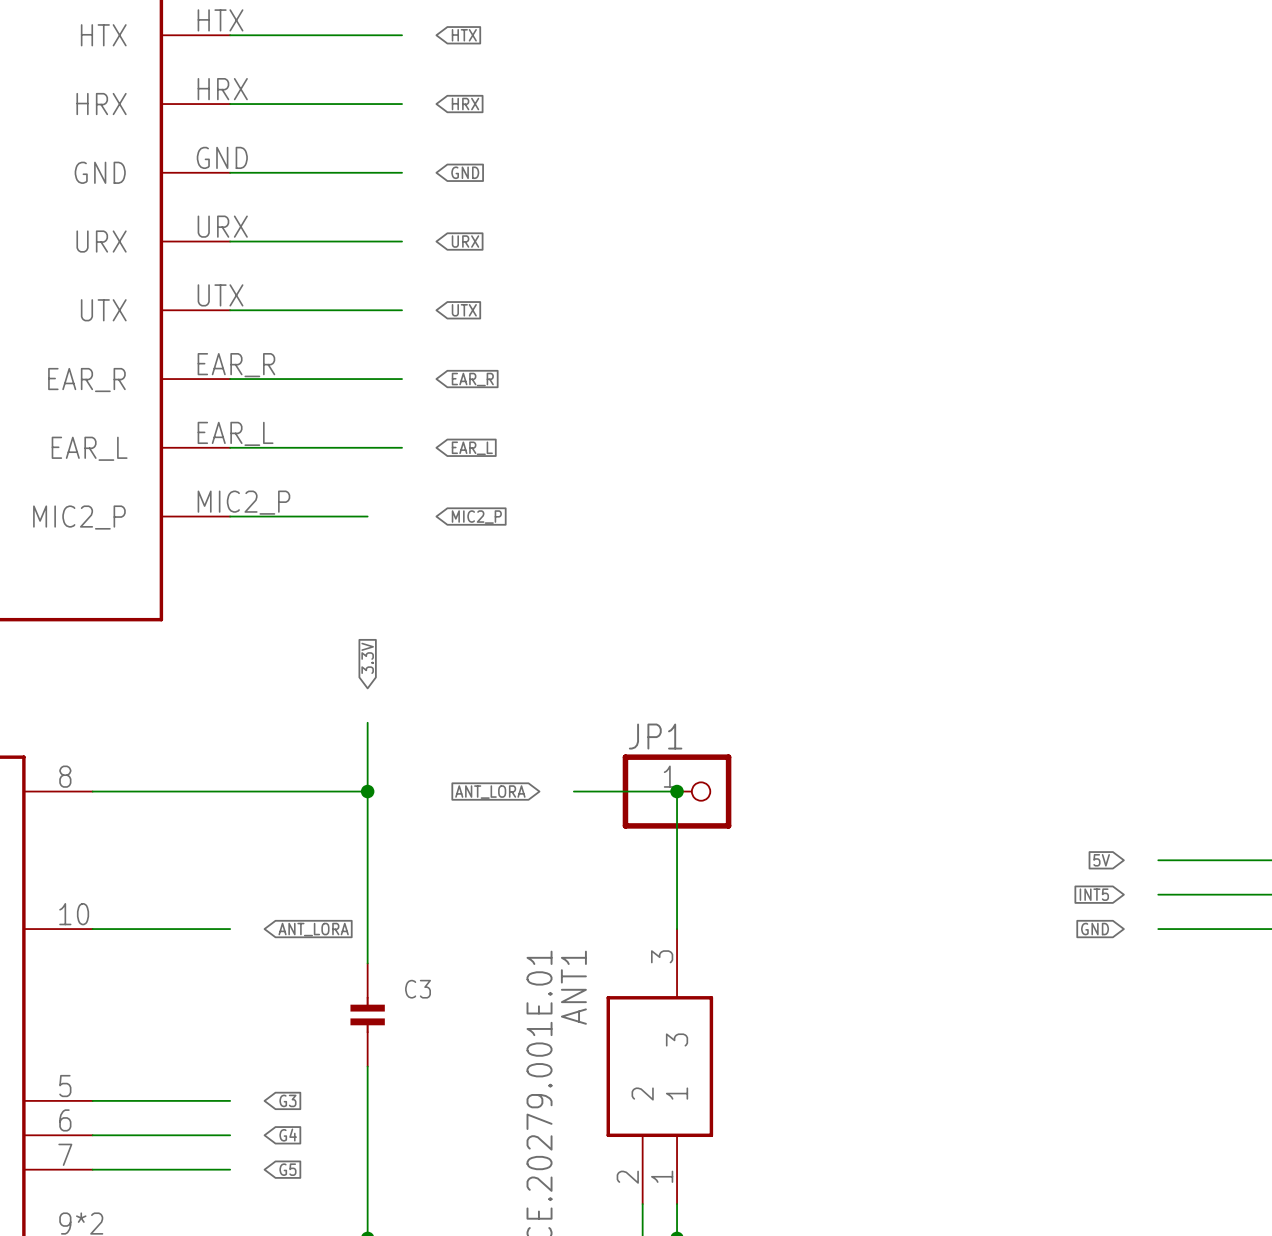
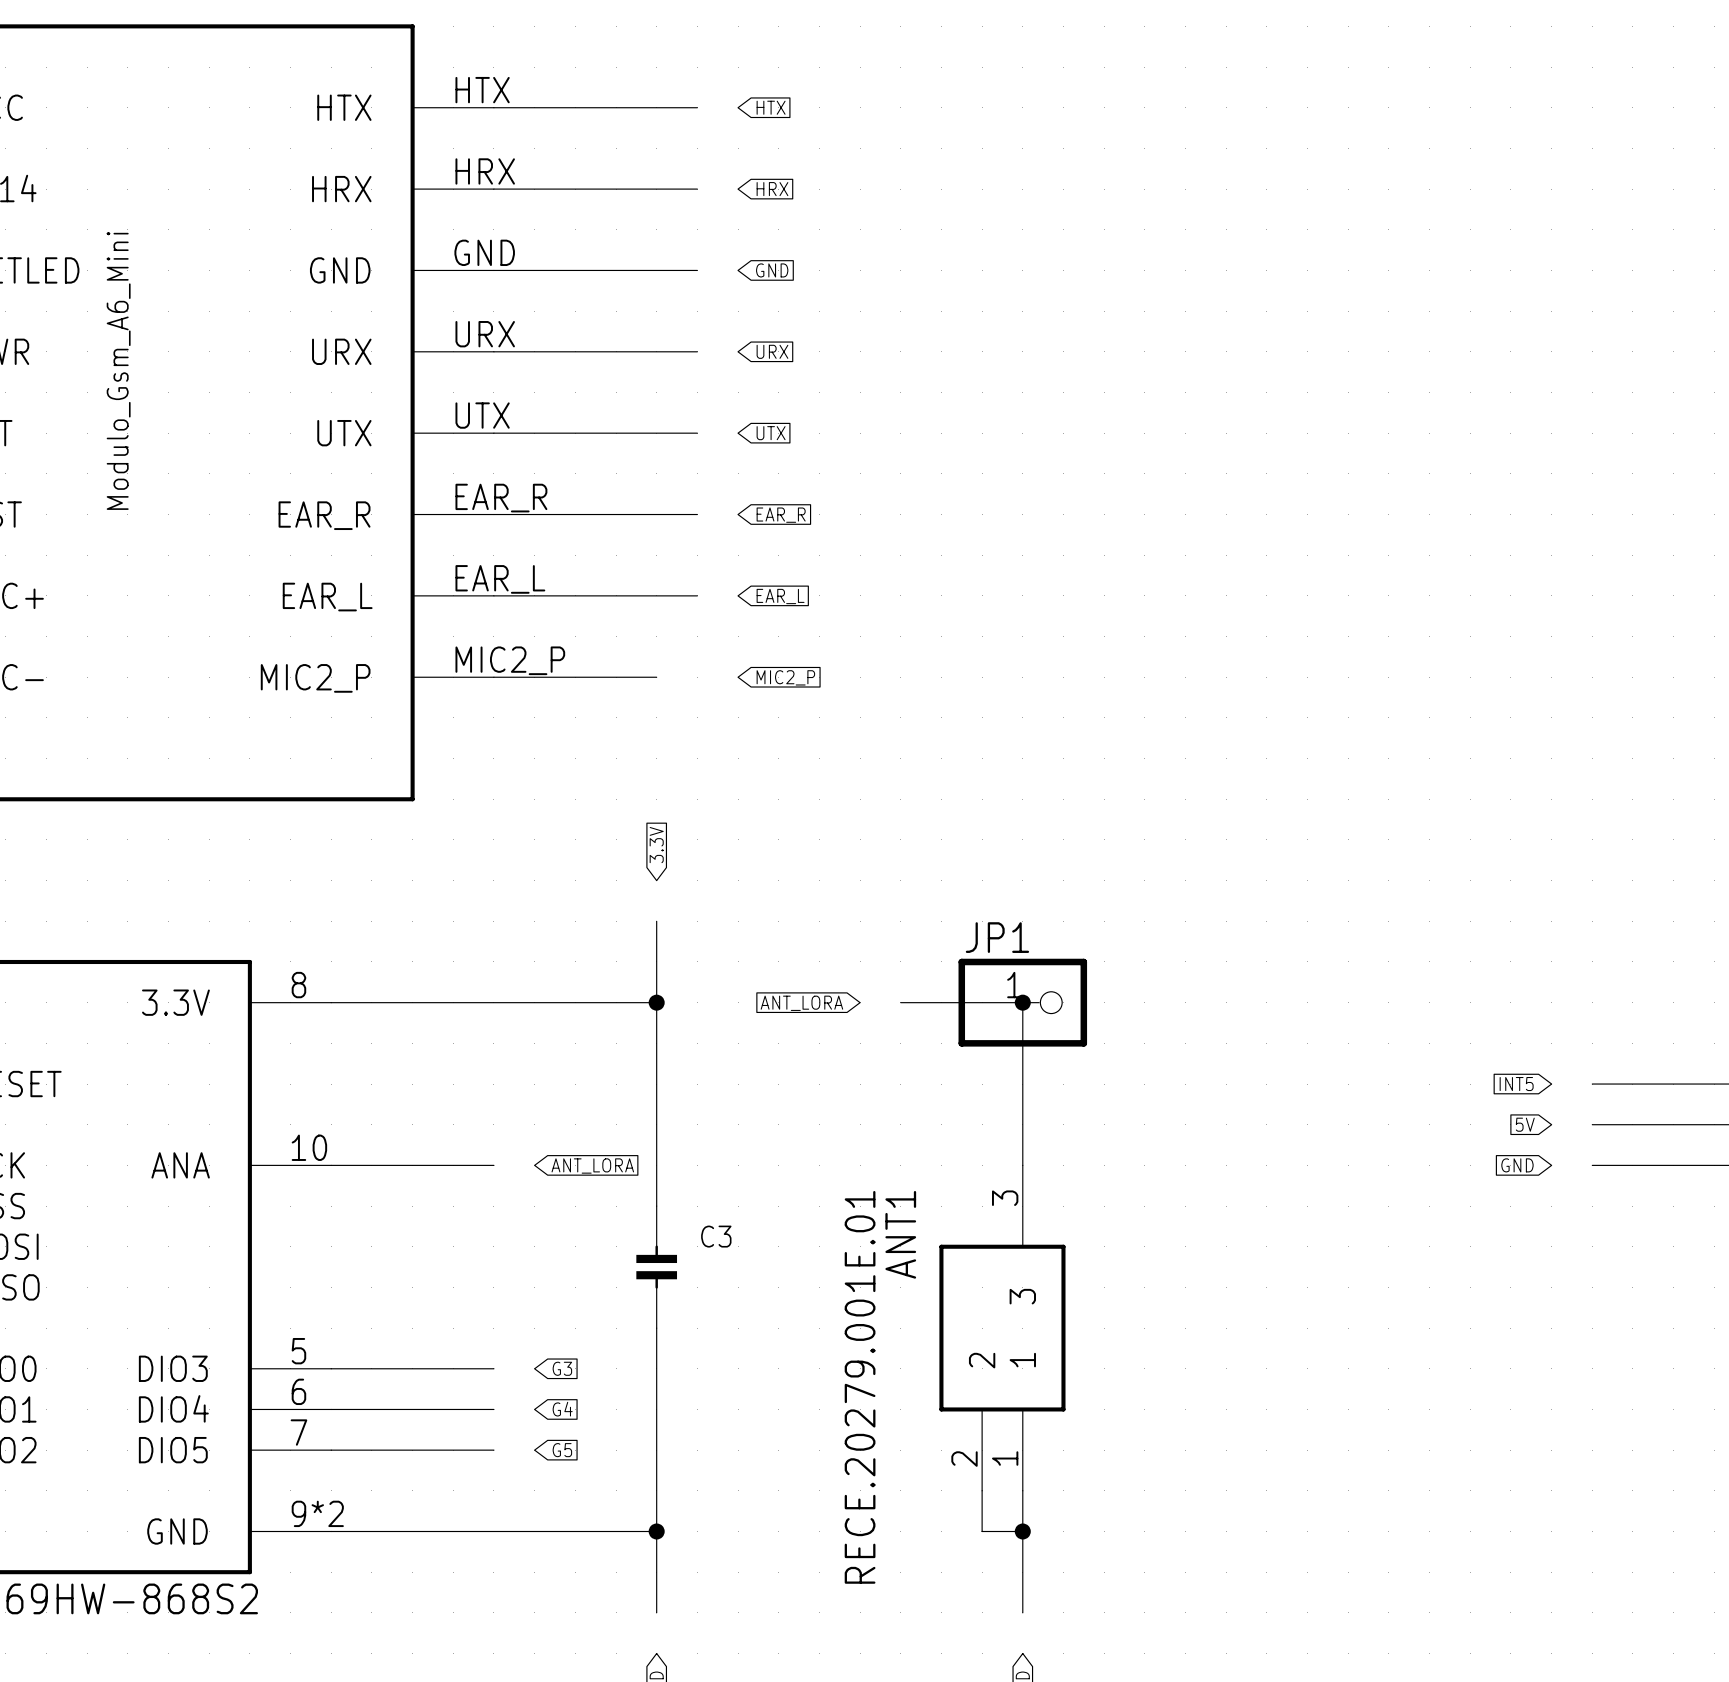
global label: 5V (1101, 860) -> INT5 (1516, 1084)
global label: INT5 (1094, 894) -> 5V (1525, 1124)

